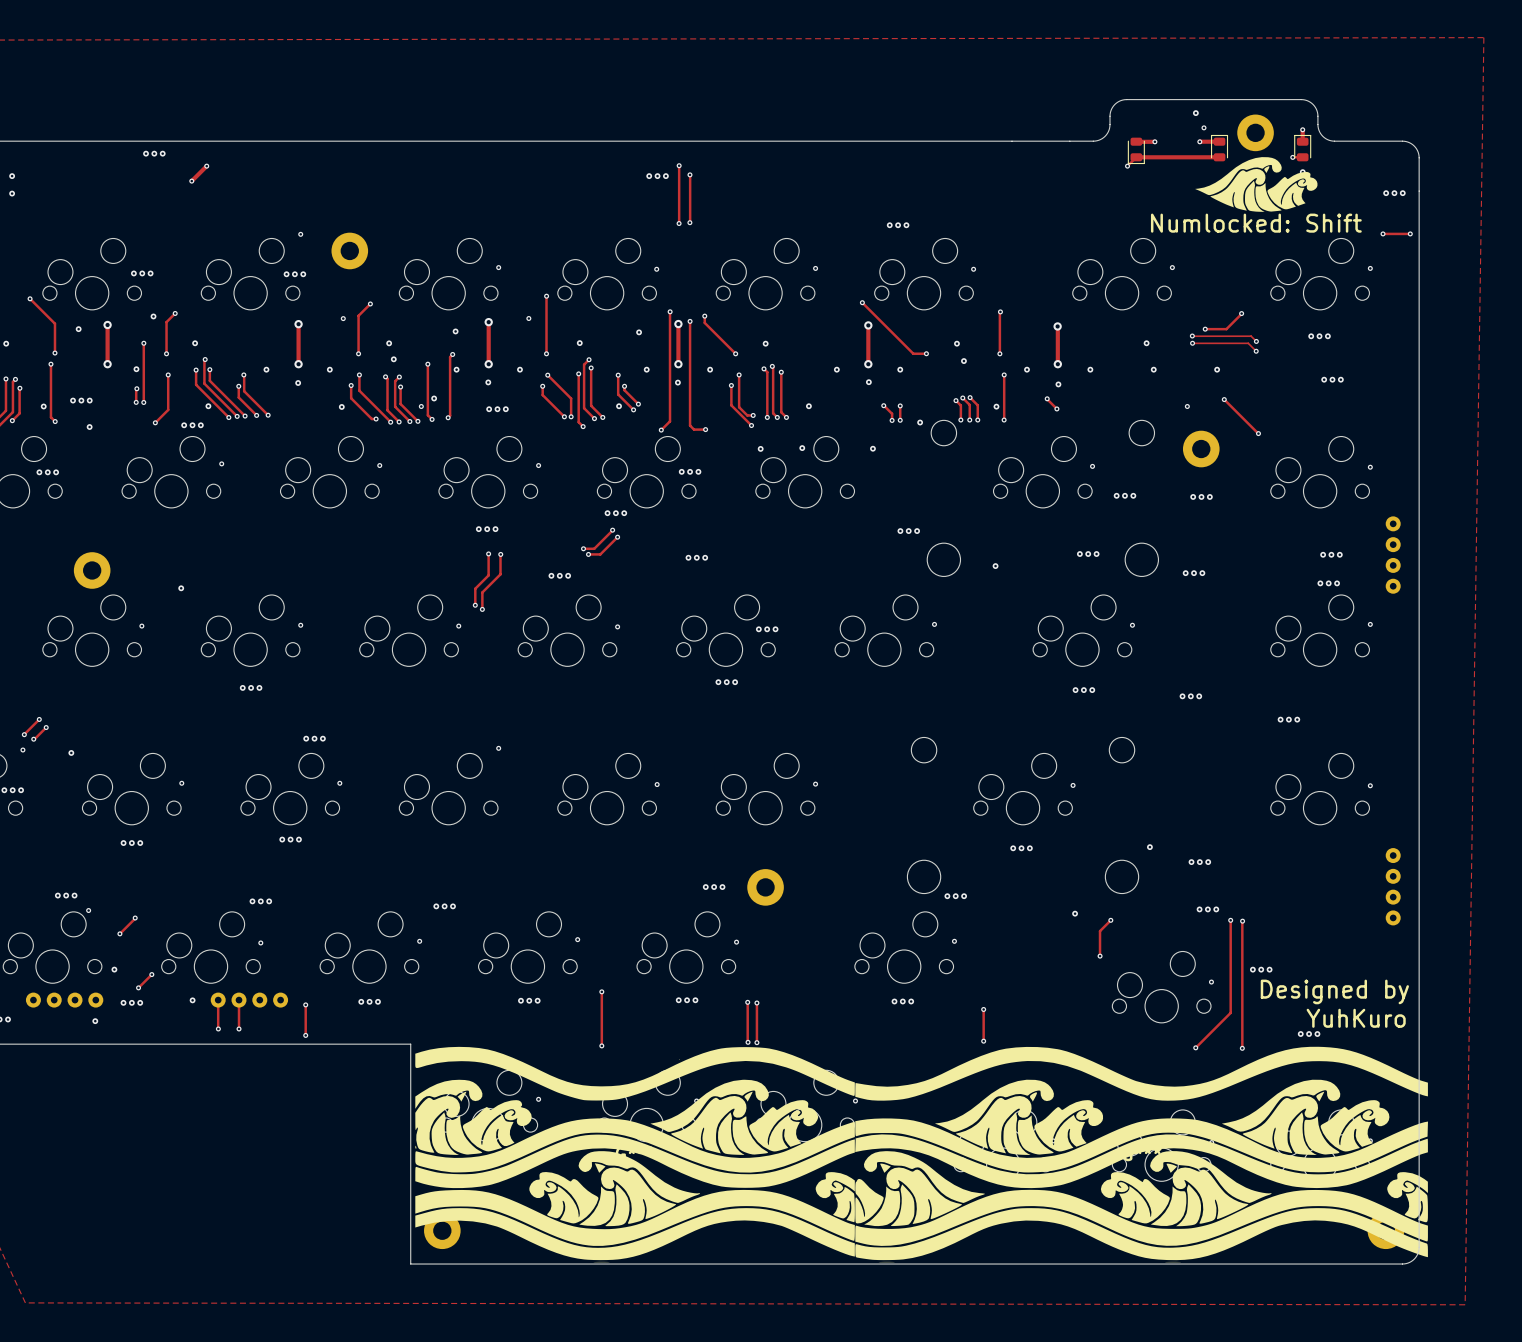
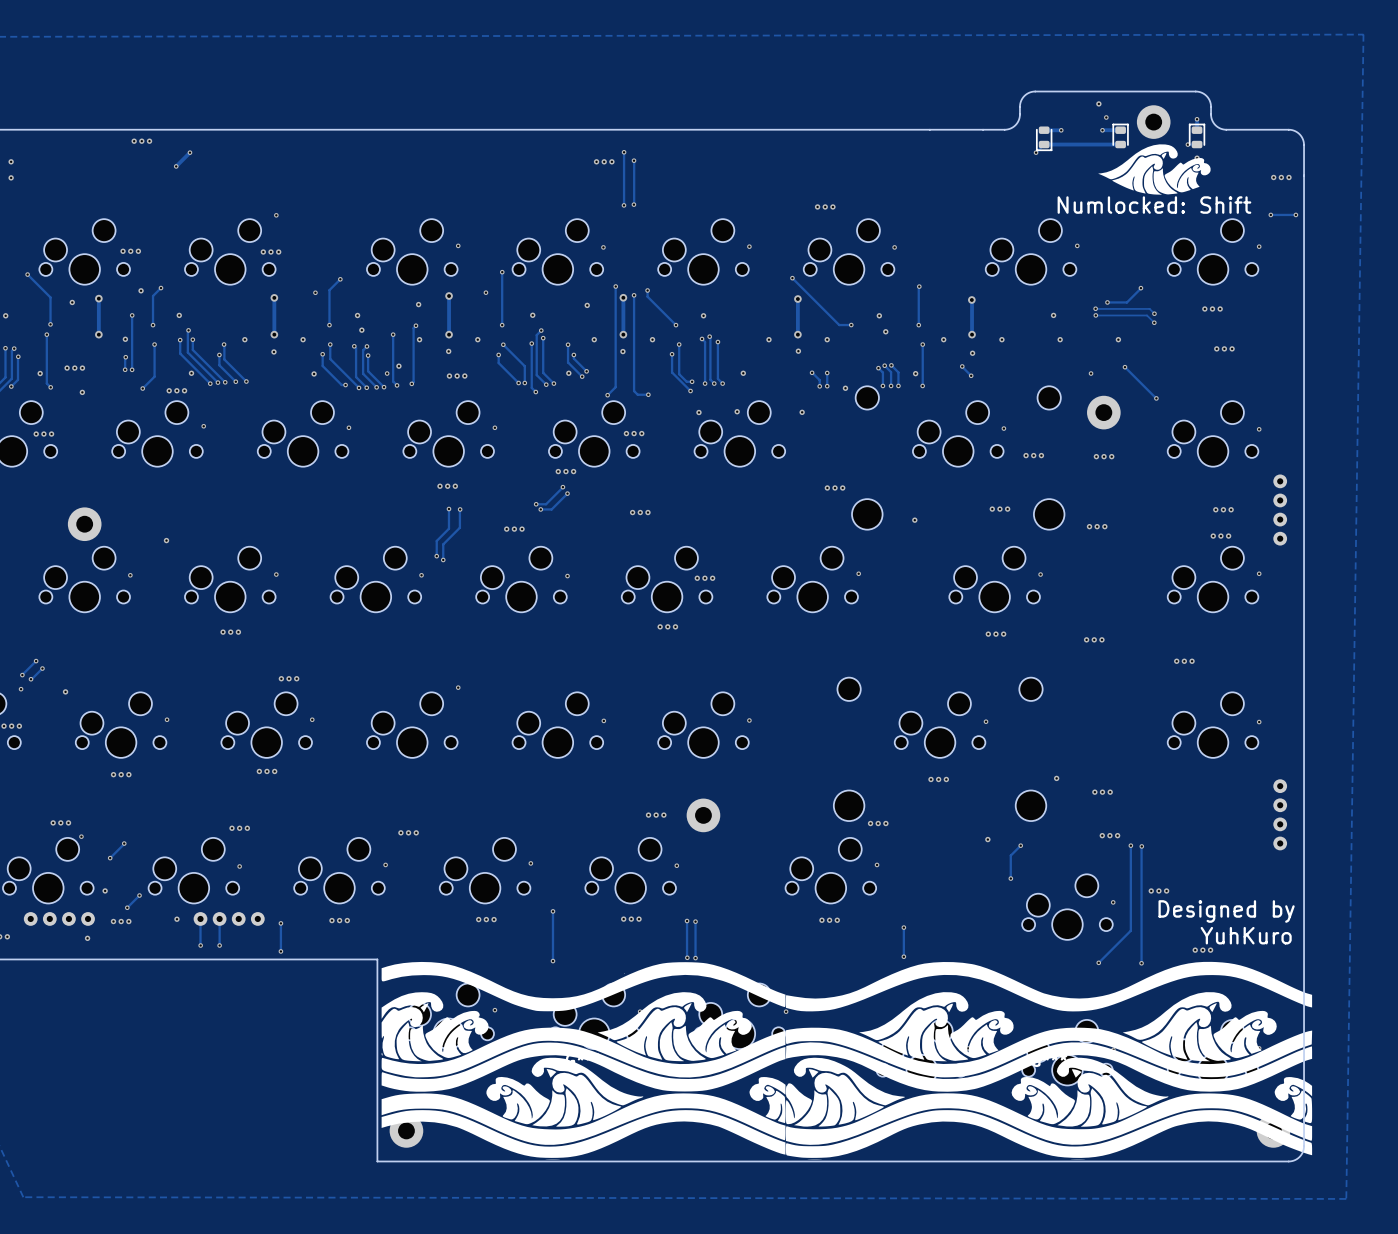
part: (349, 250) -> none

